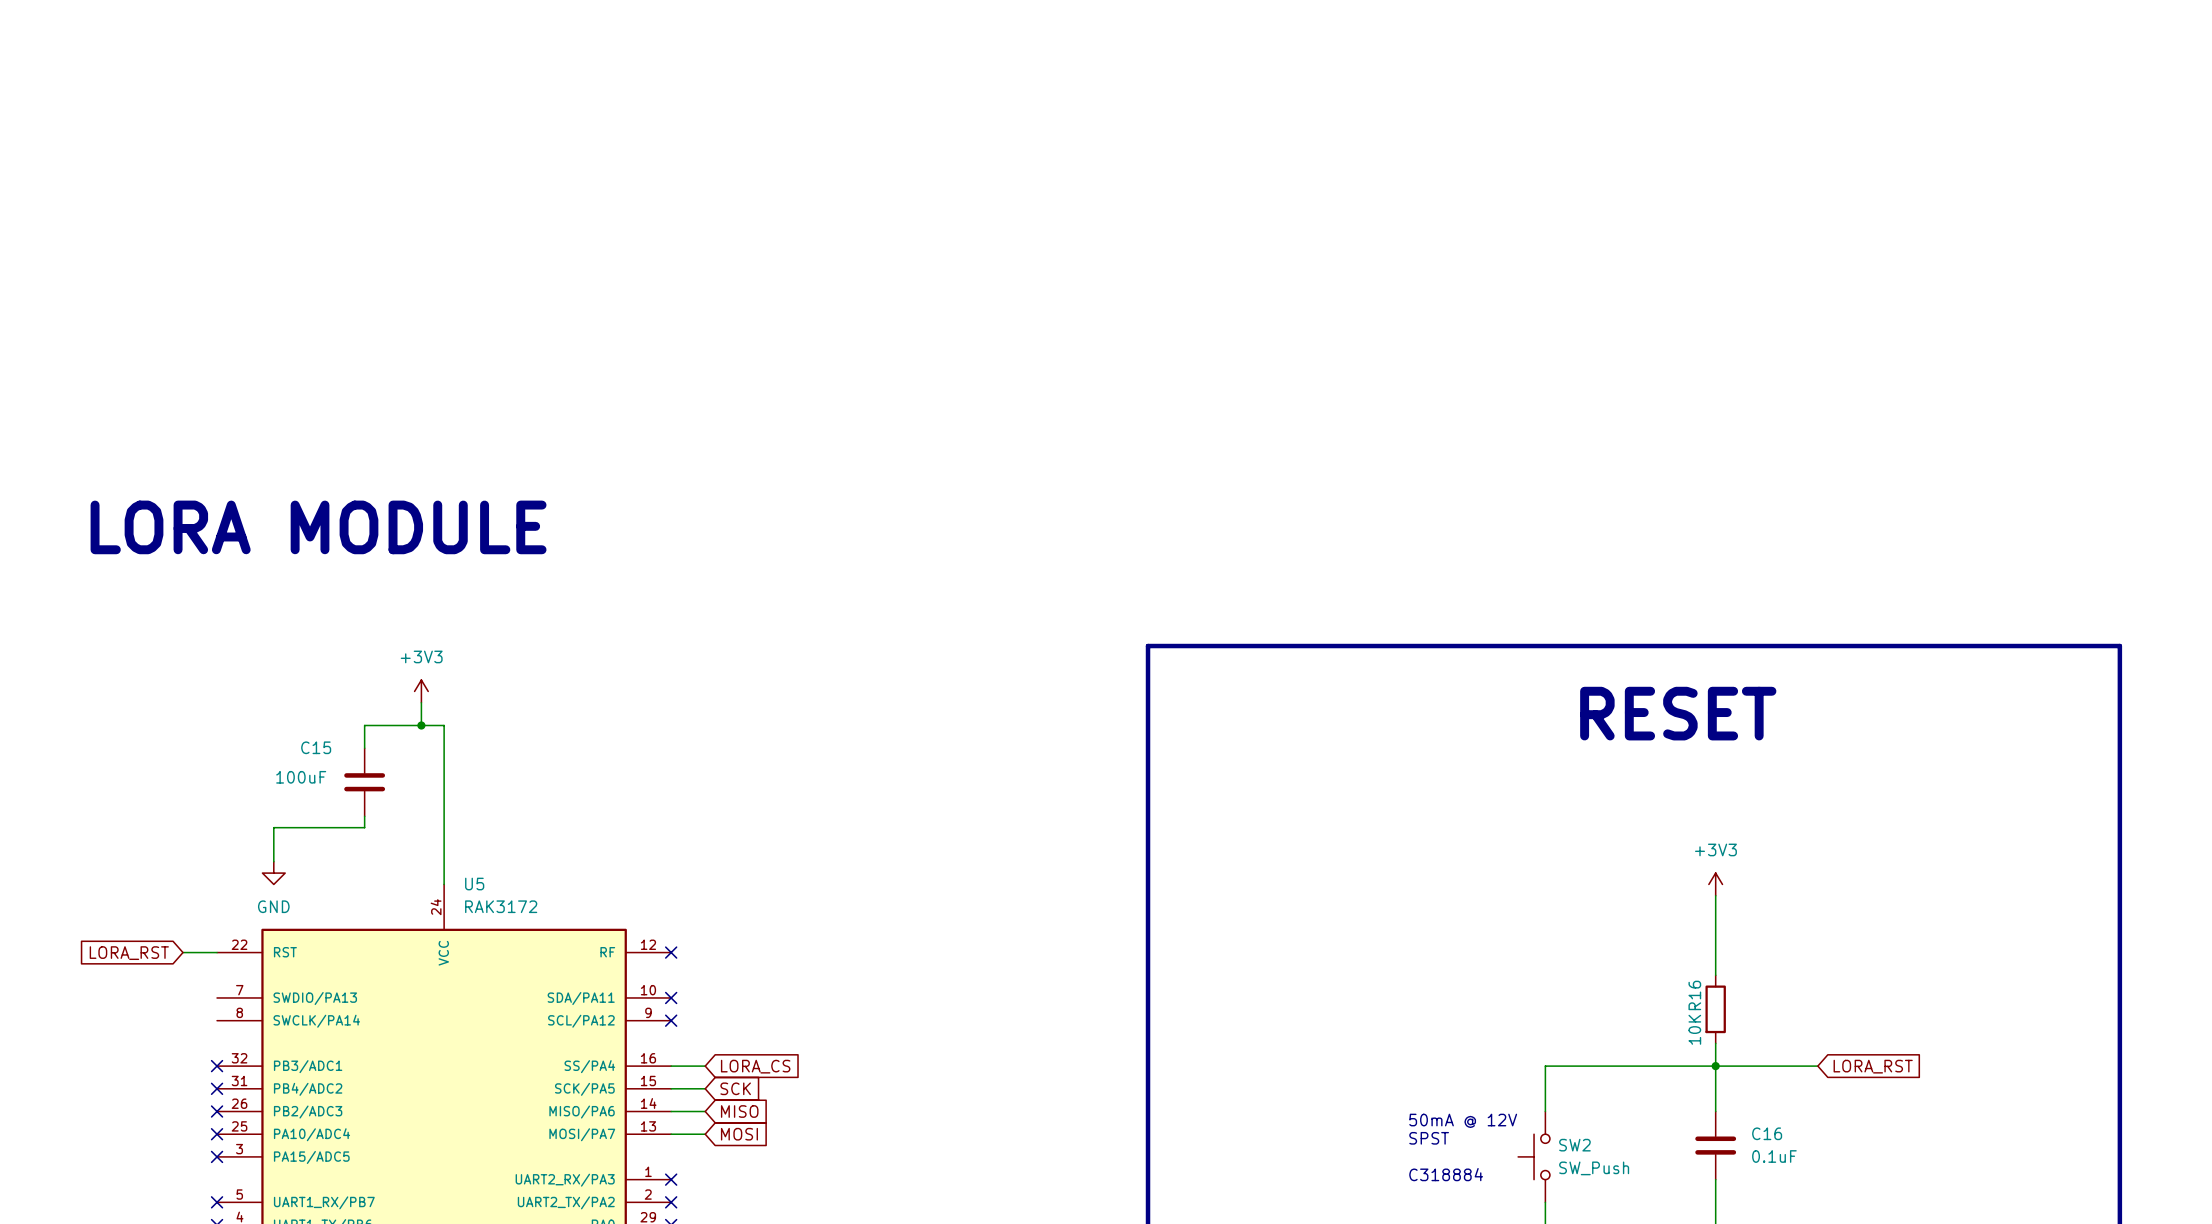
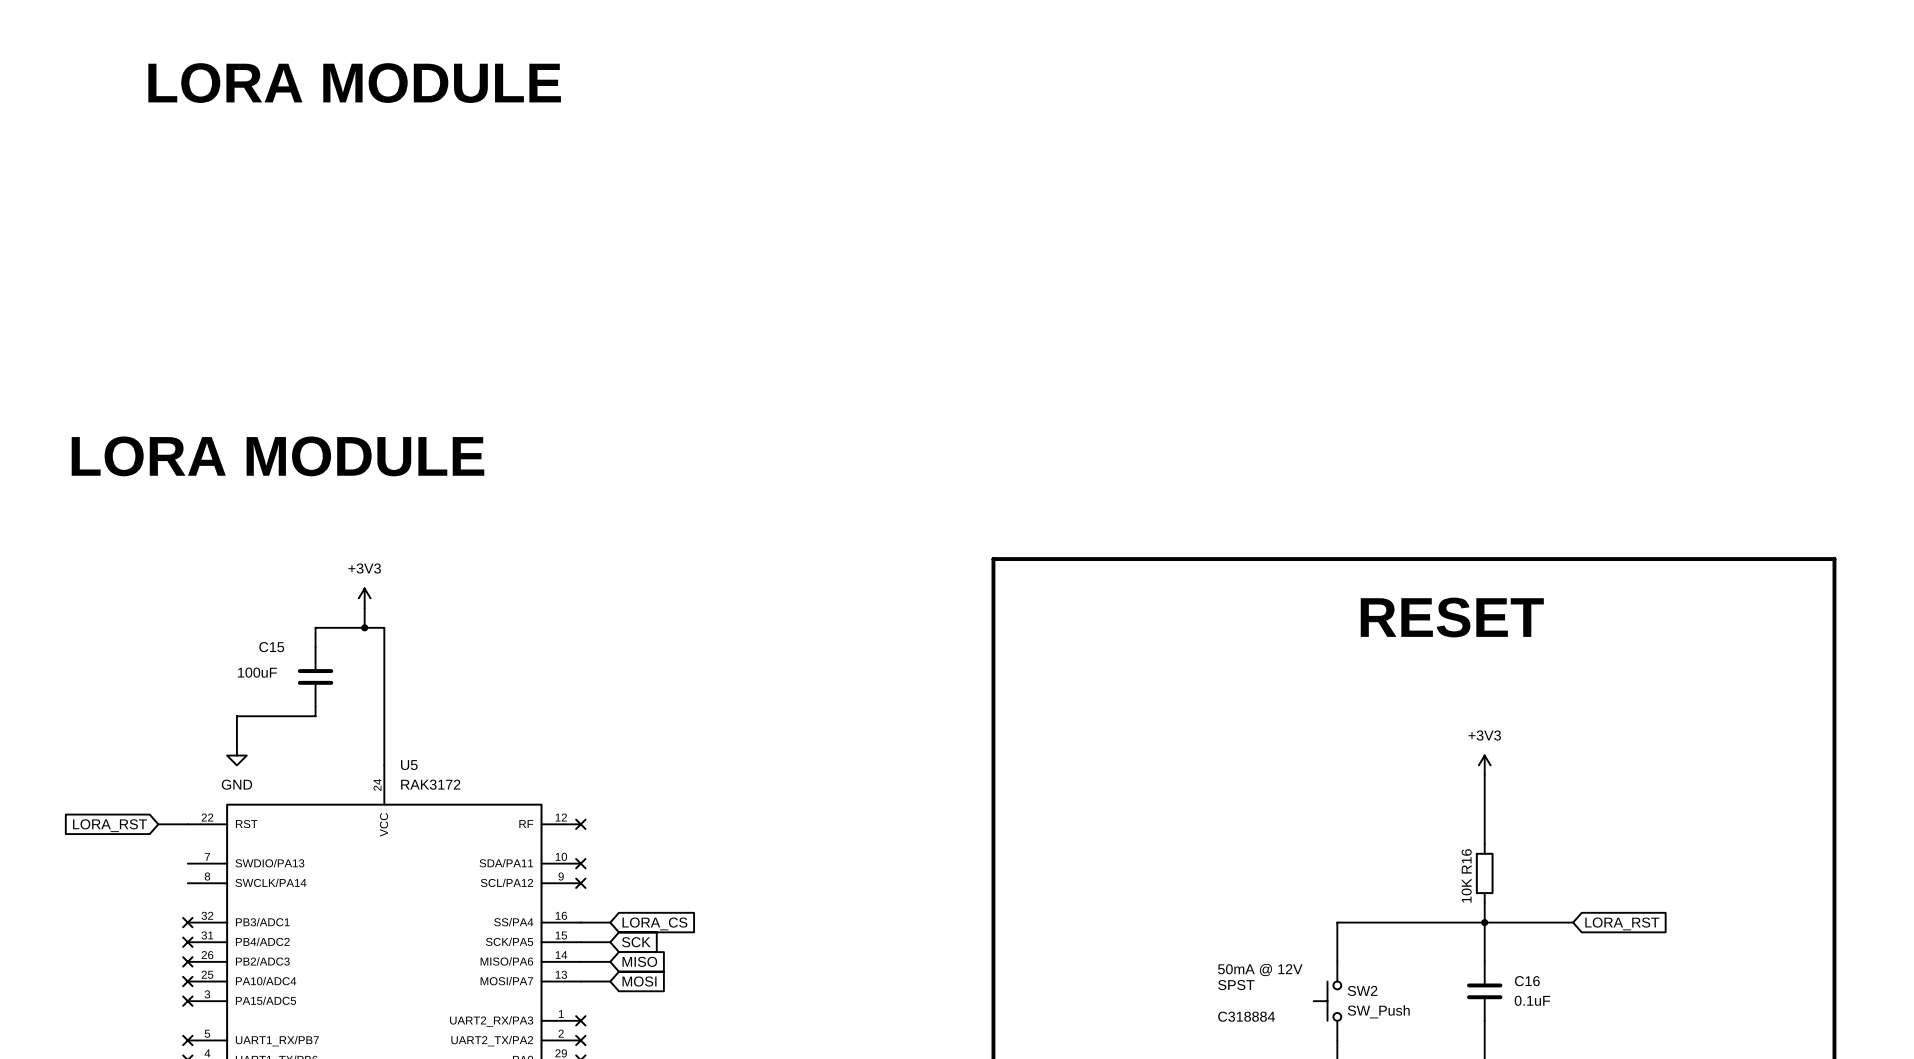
text: none -> LORA MODULE (354, 83)

